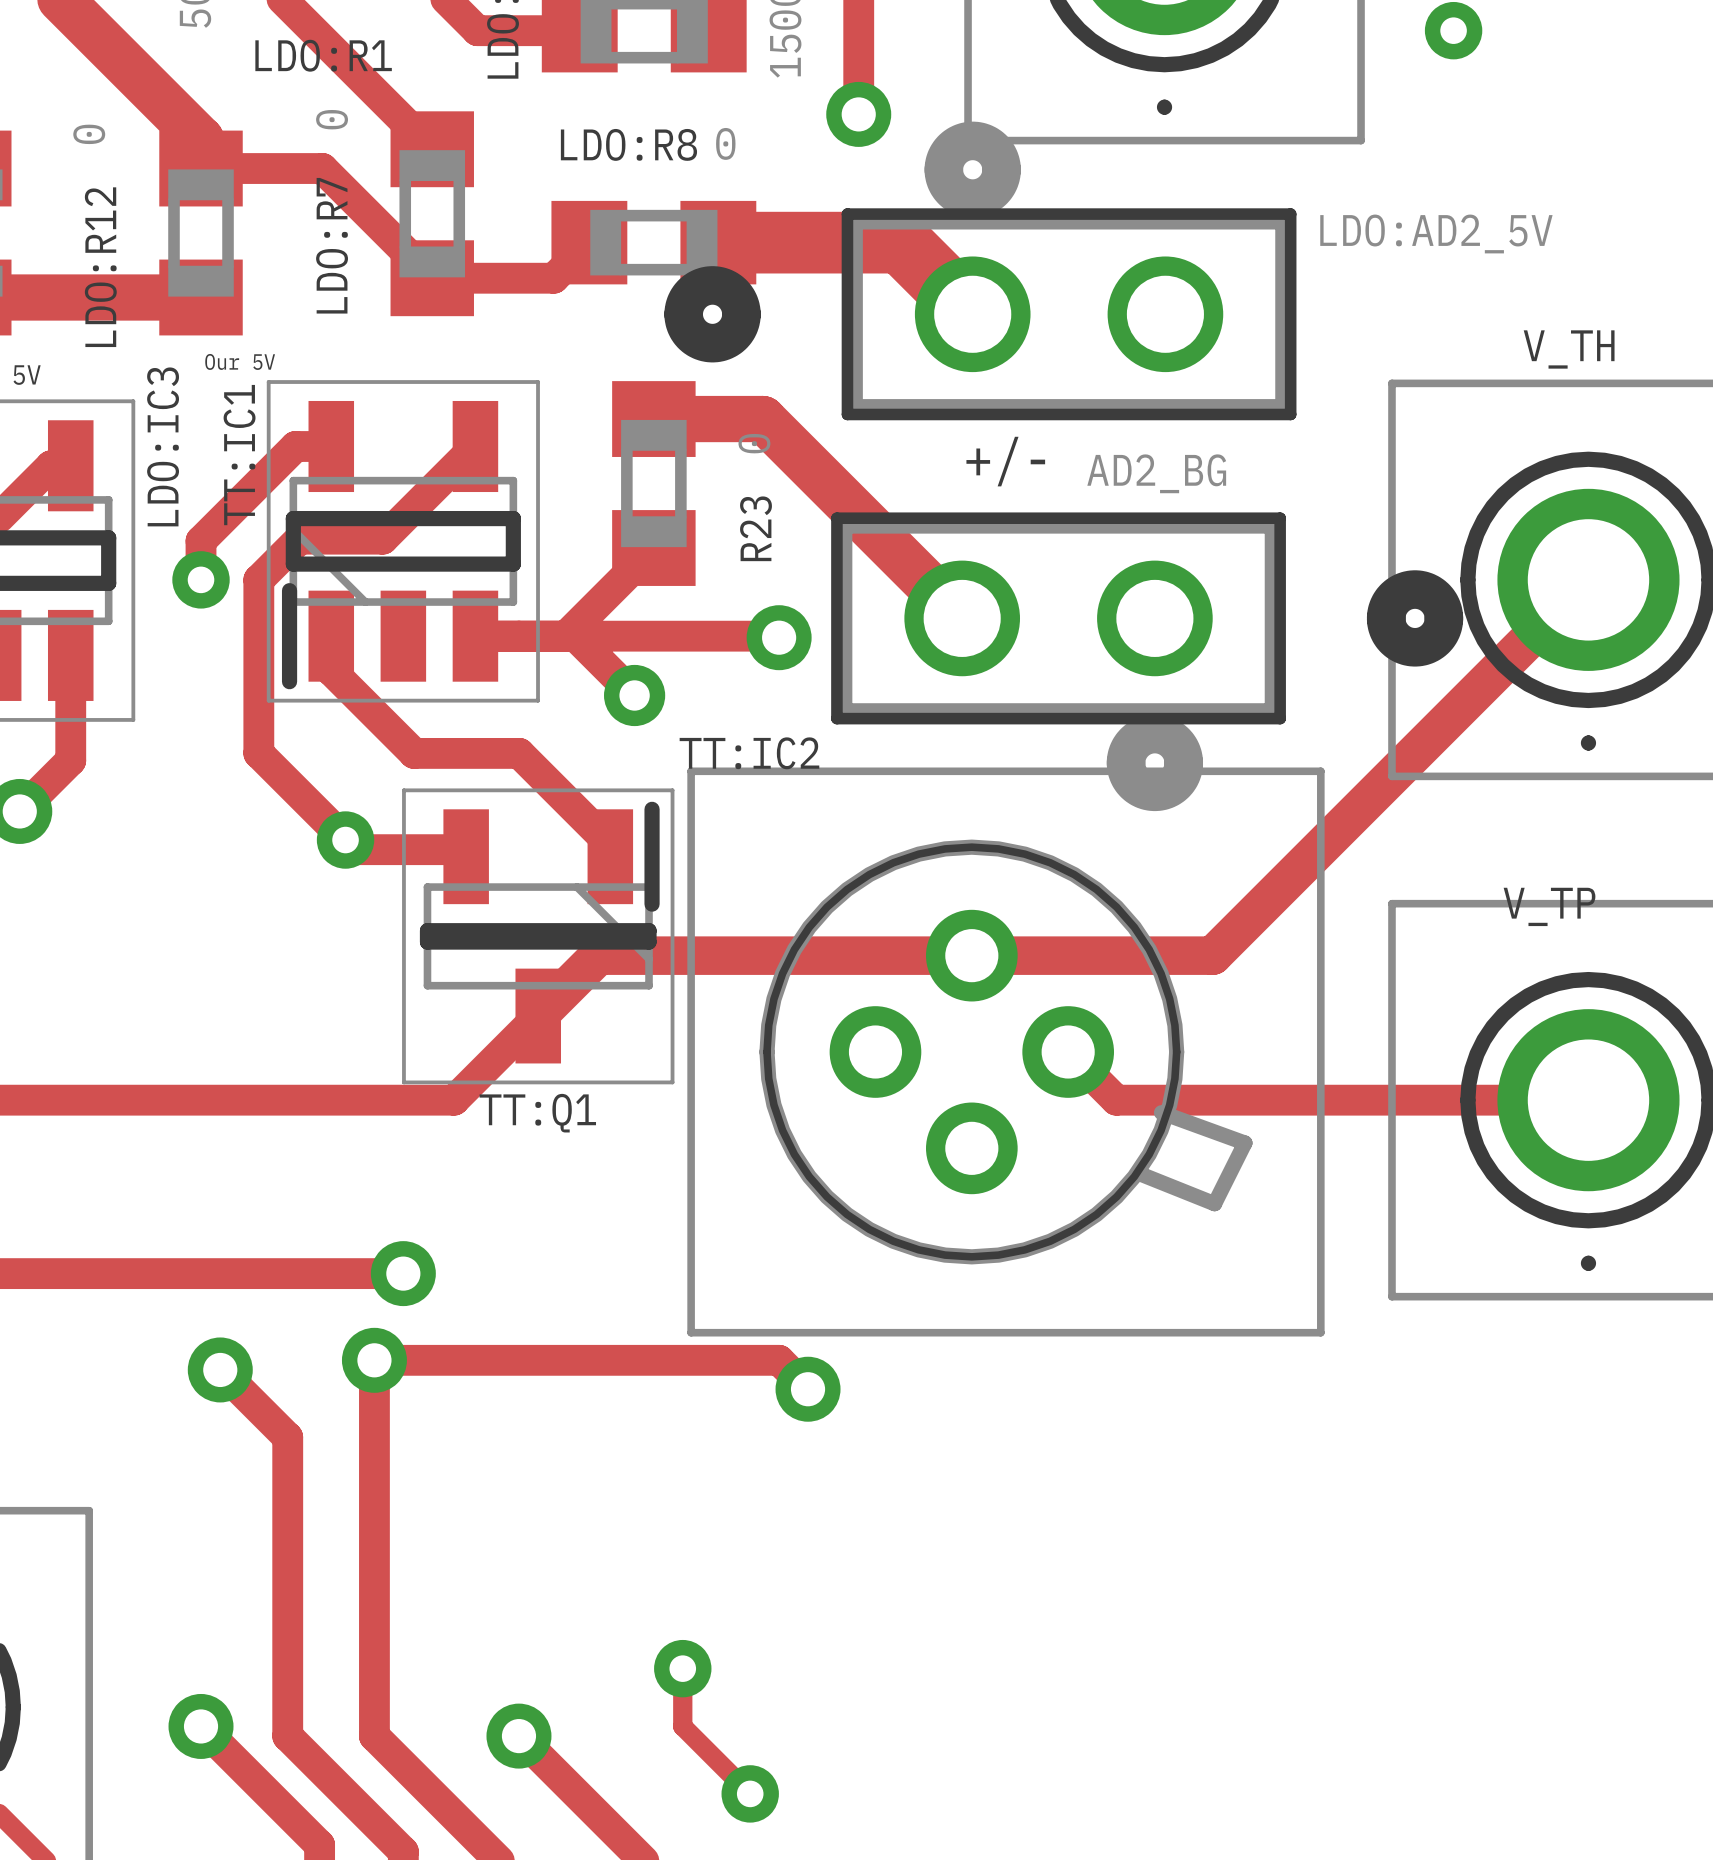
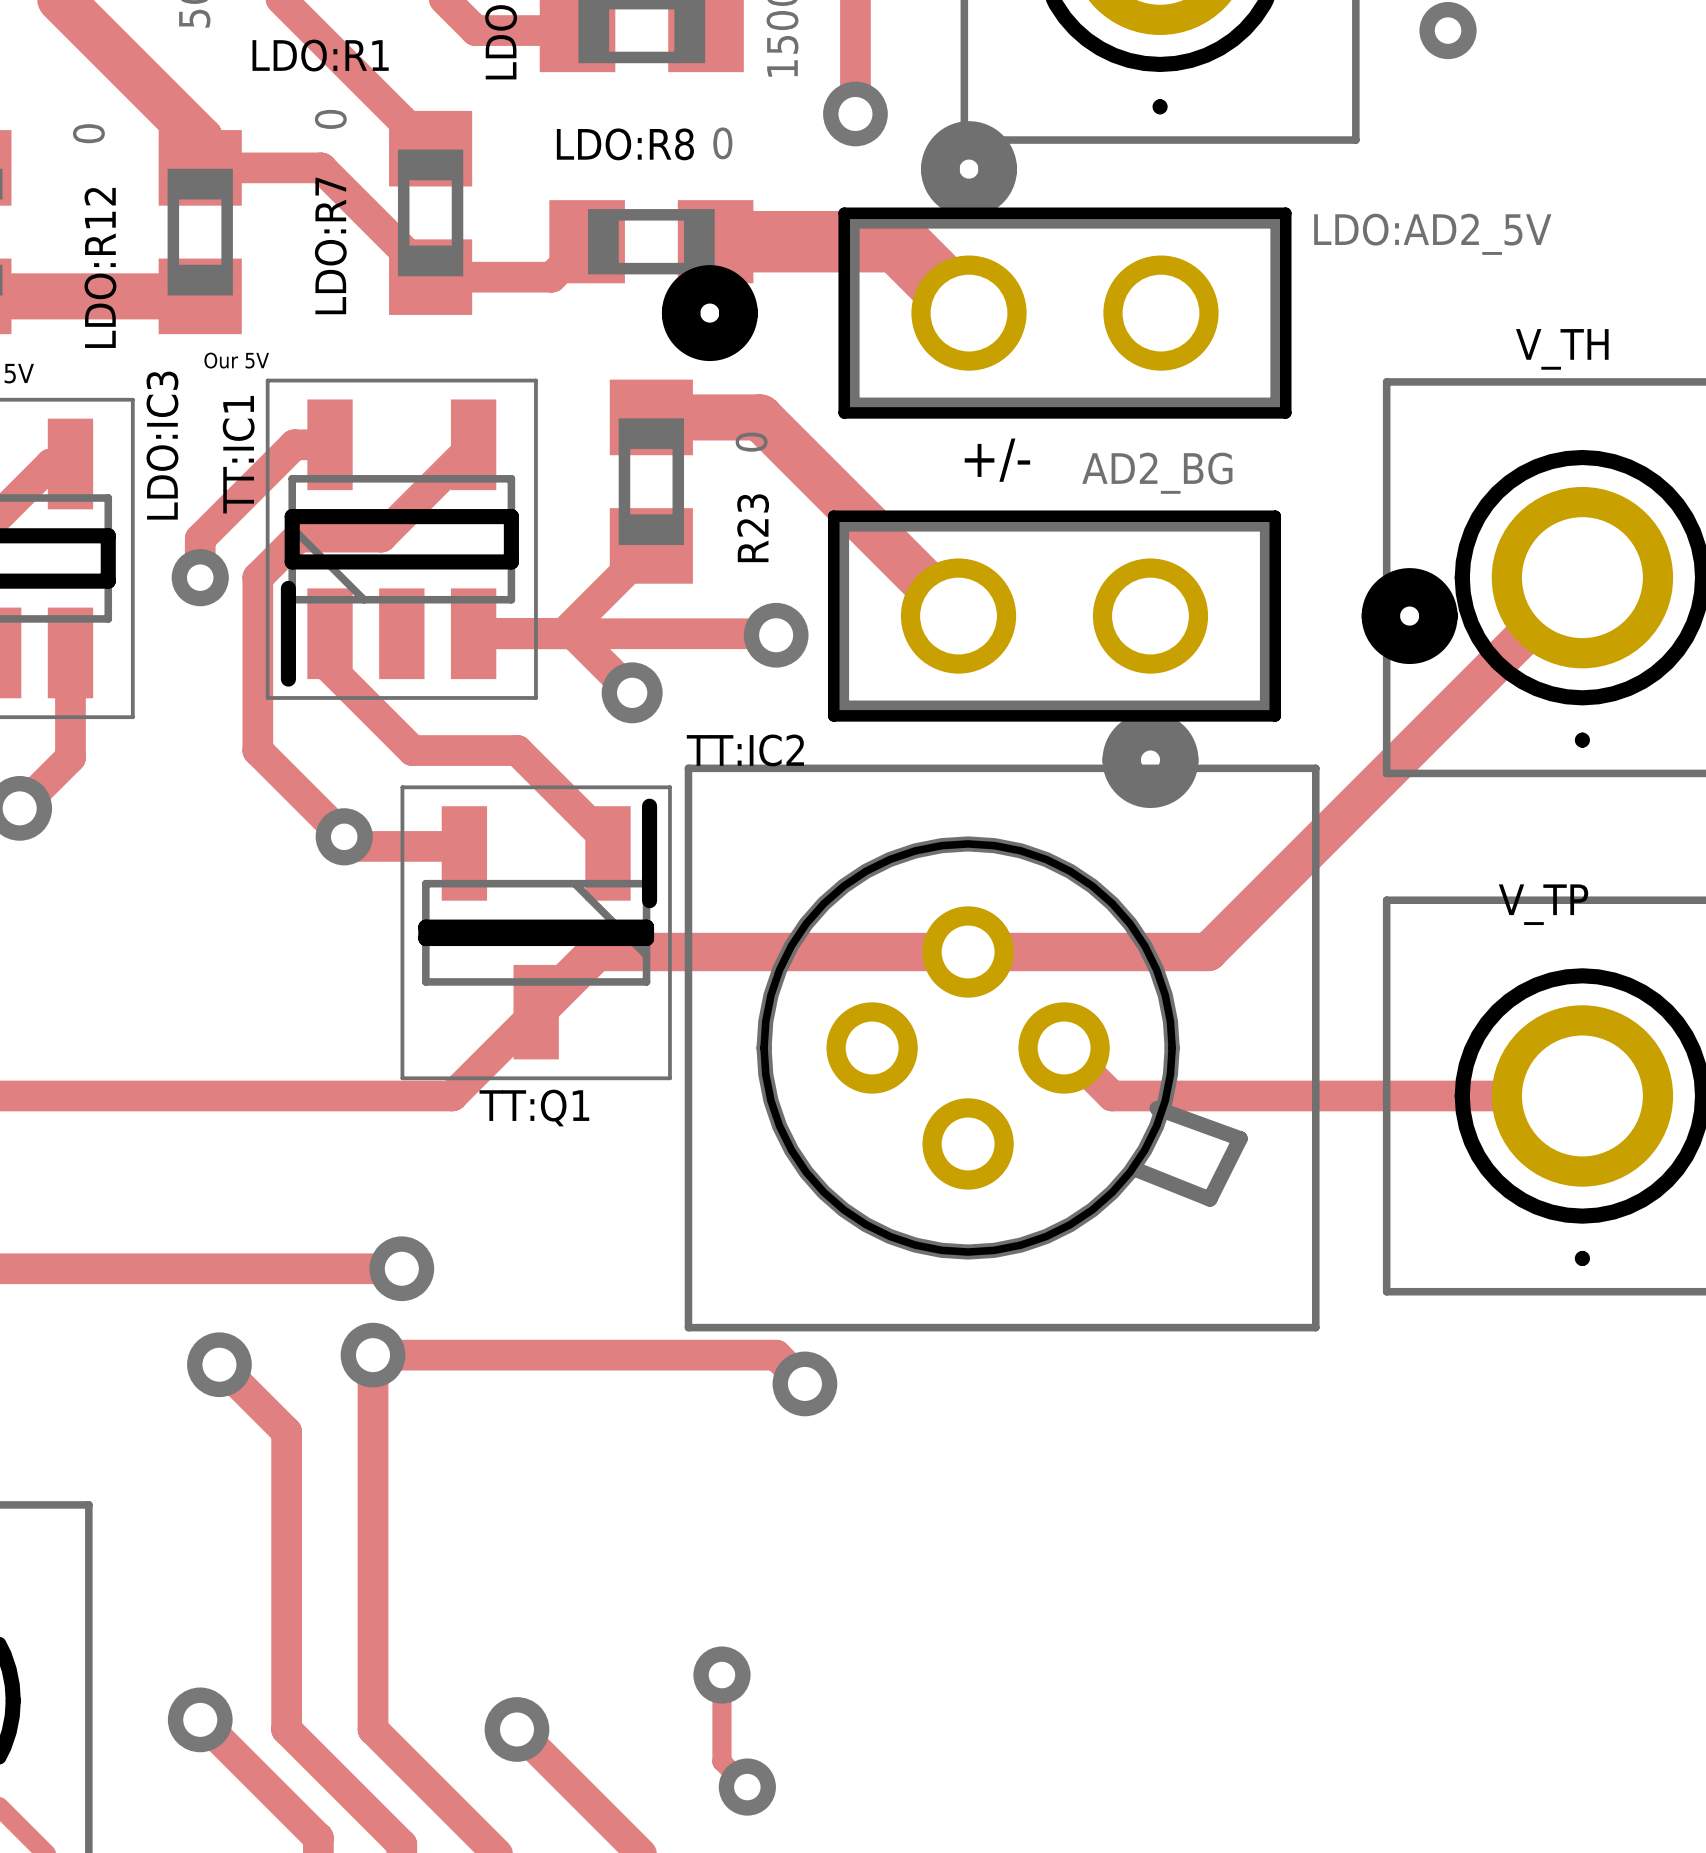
track: (682, 1668) (682, 1726) (724, 1768) -> (721, 1675) (721, 1761)
via position: (682, 1668) -> (721, 1675)

